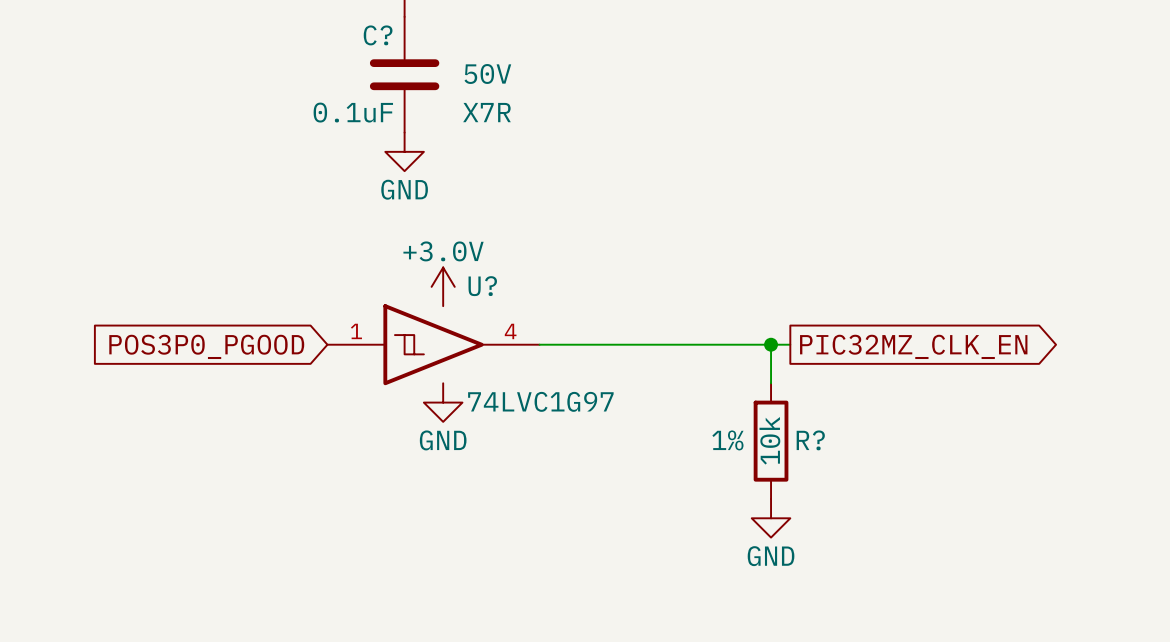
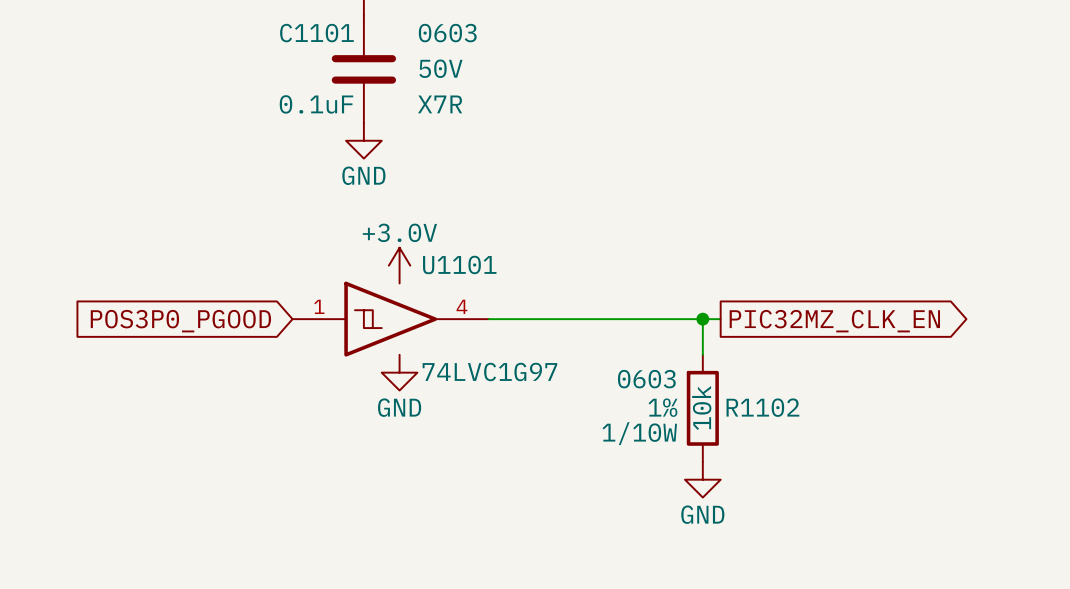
C? name: C? (378, 35) -> C1101 (316, 33)
C? text: none -> 0603 (447, 33)
U? name: U? (482, 286) -> U1101 (459, 264)
R? text: none -> 0603 (646, 379)
R? name: R? (810, 440) -> R1102 (762, 407)
R? text: none -> 1/10W (639, 433)

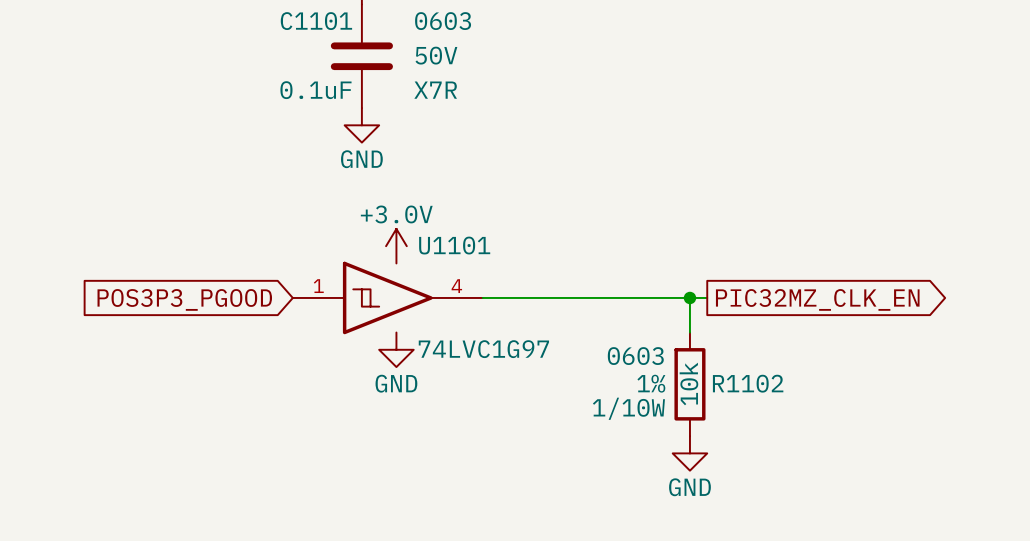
global label: POS3P0_PGOOD (180, 321) -> POS3P3_PGOOD (184, 299)

